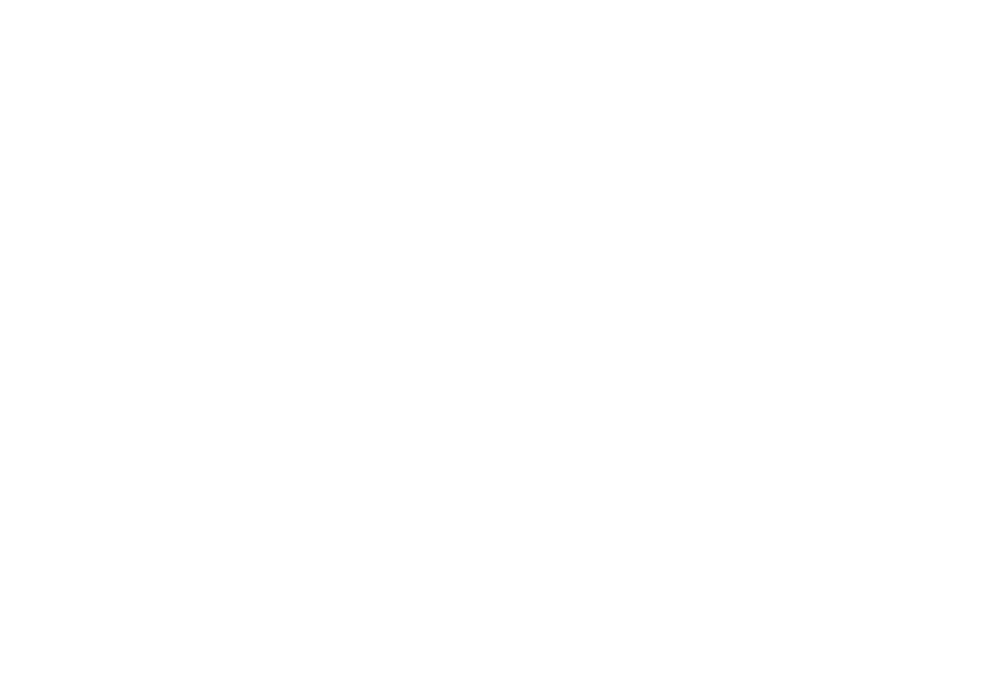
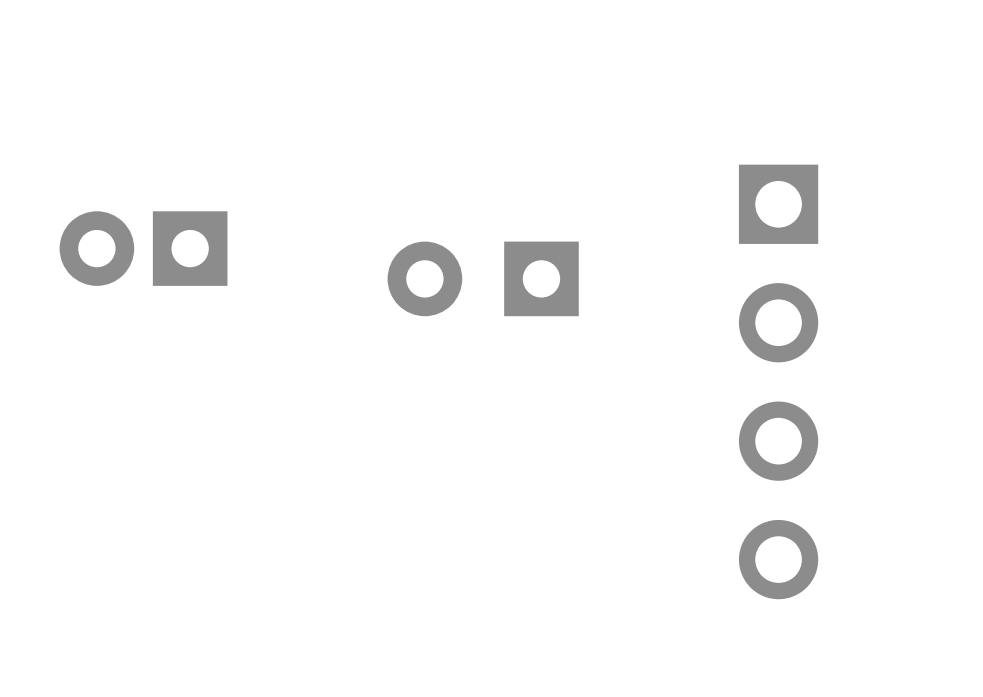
part: none -> (143, 248)
part: none -> (483, 278)
part: none -> (778, 381)

